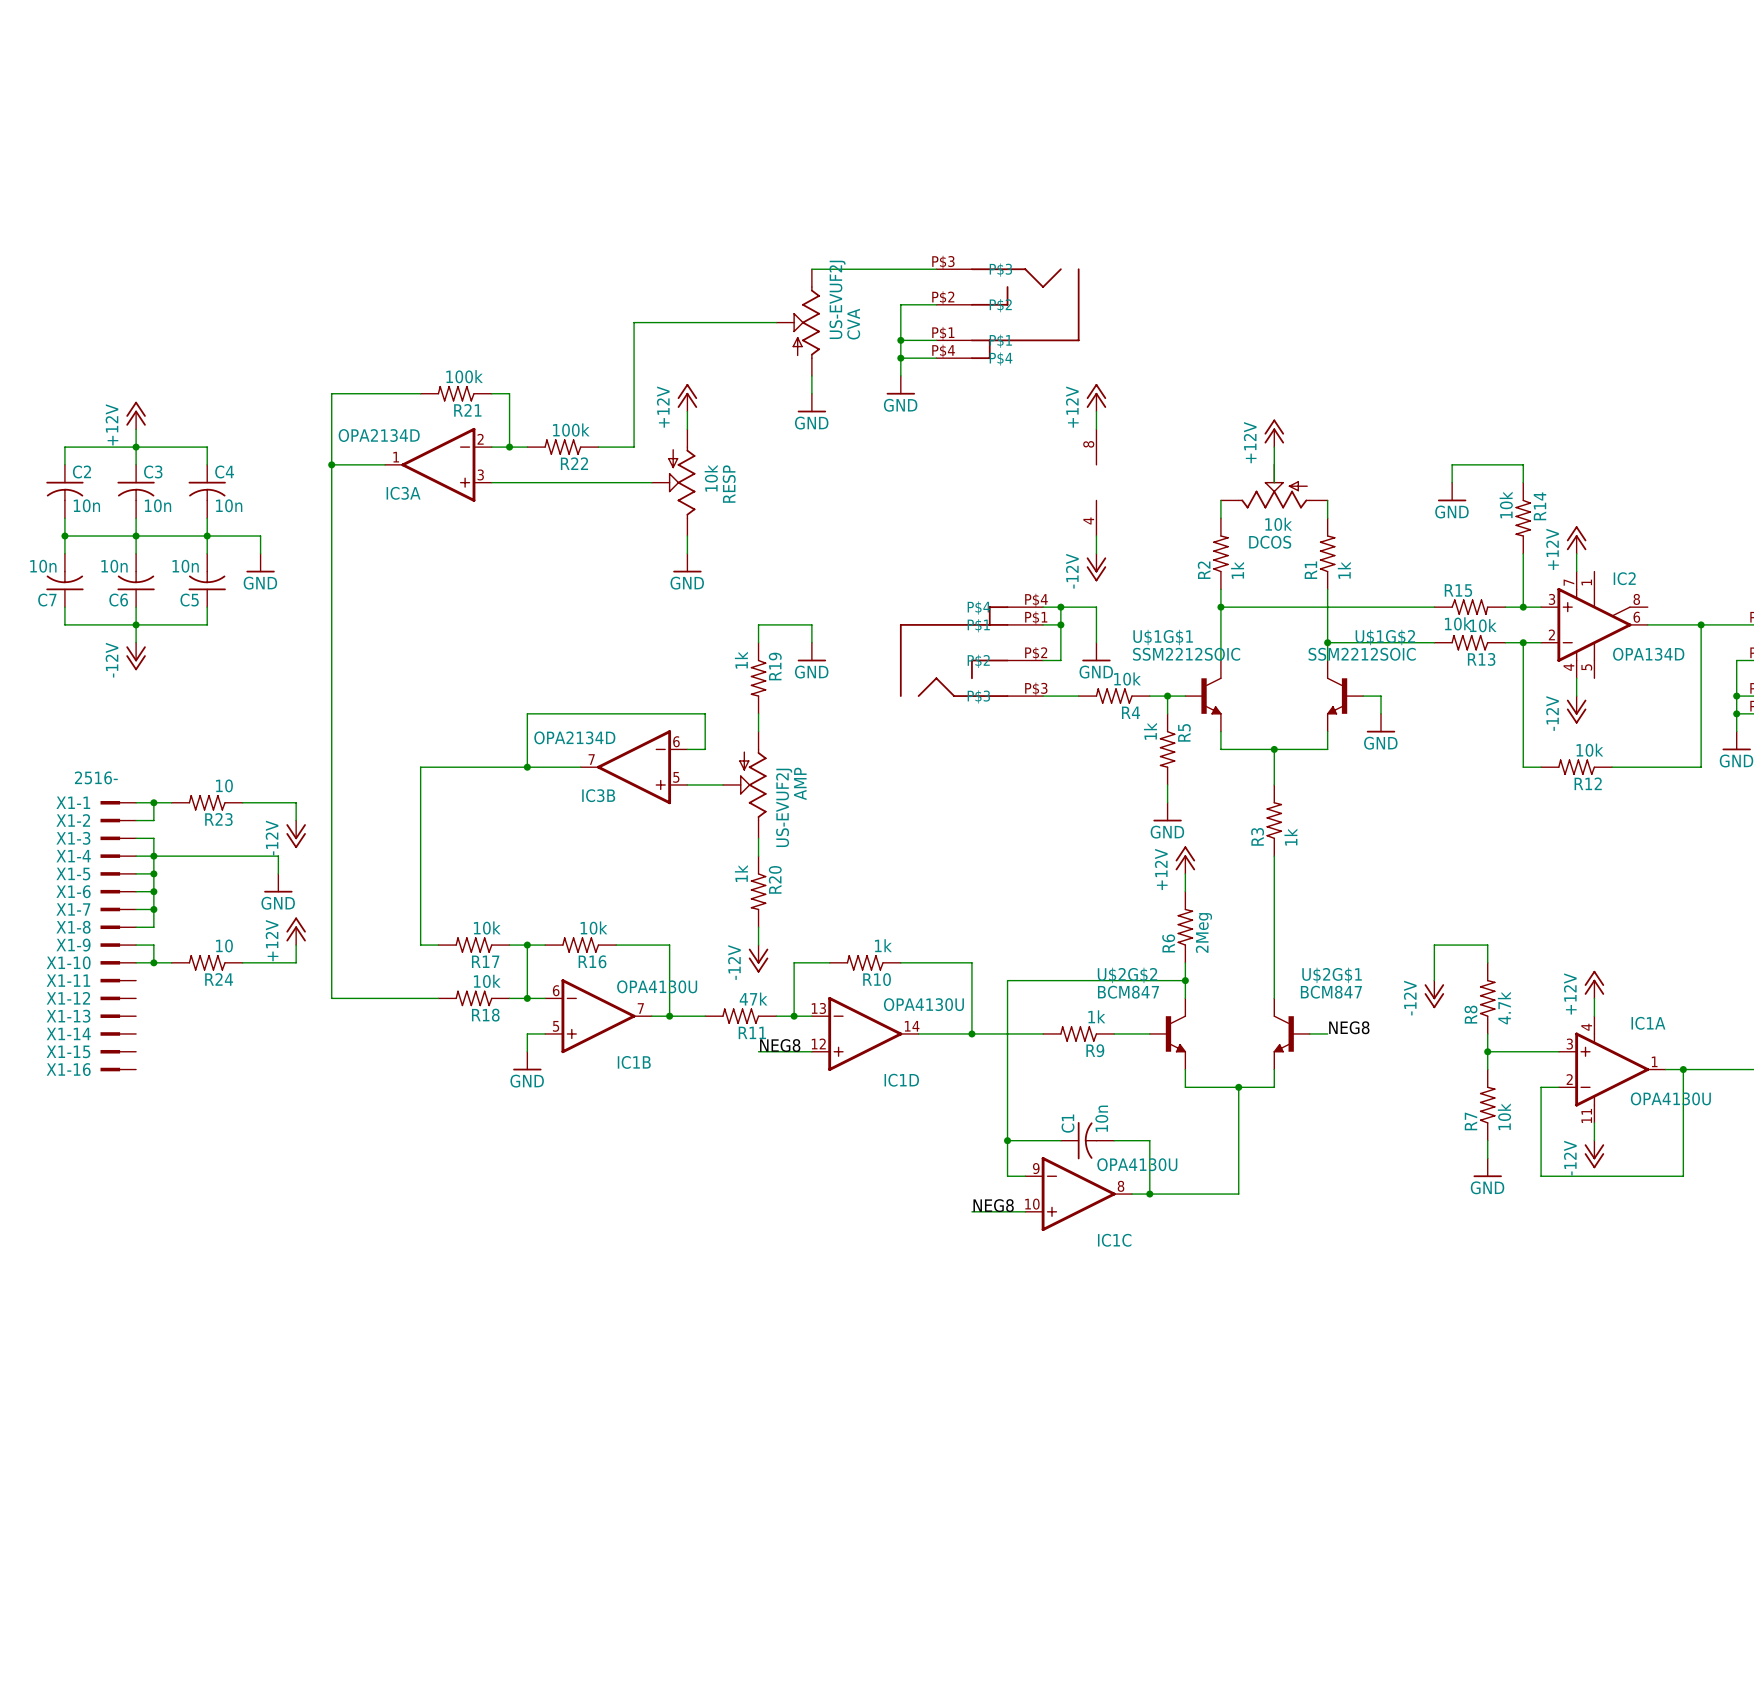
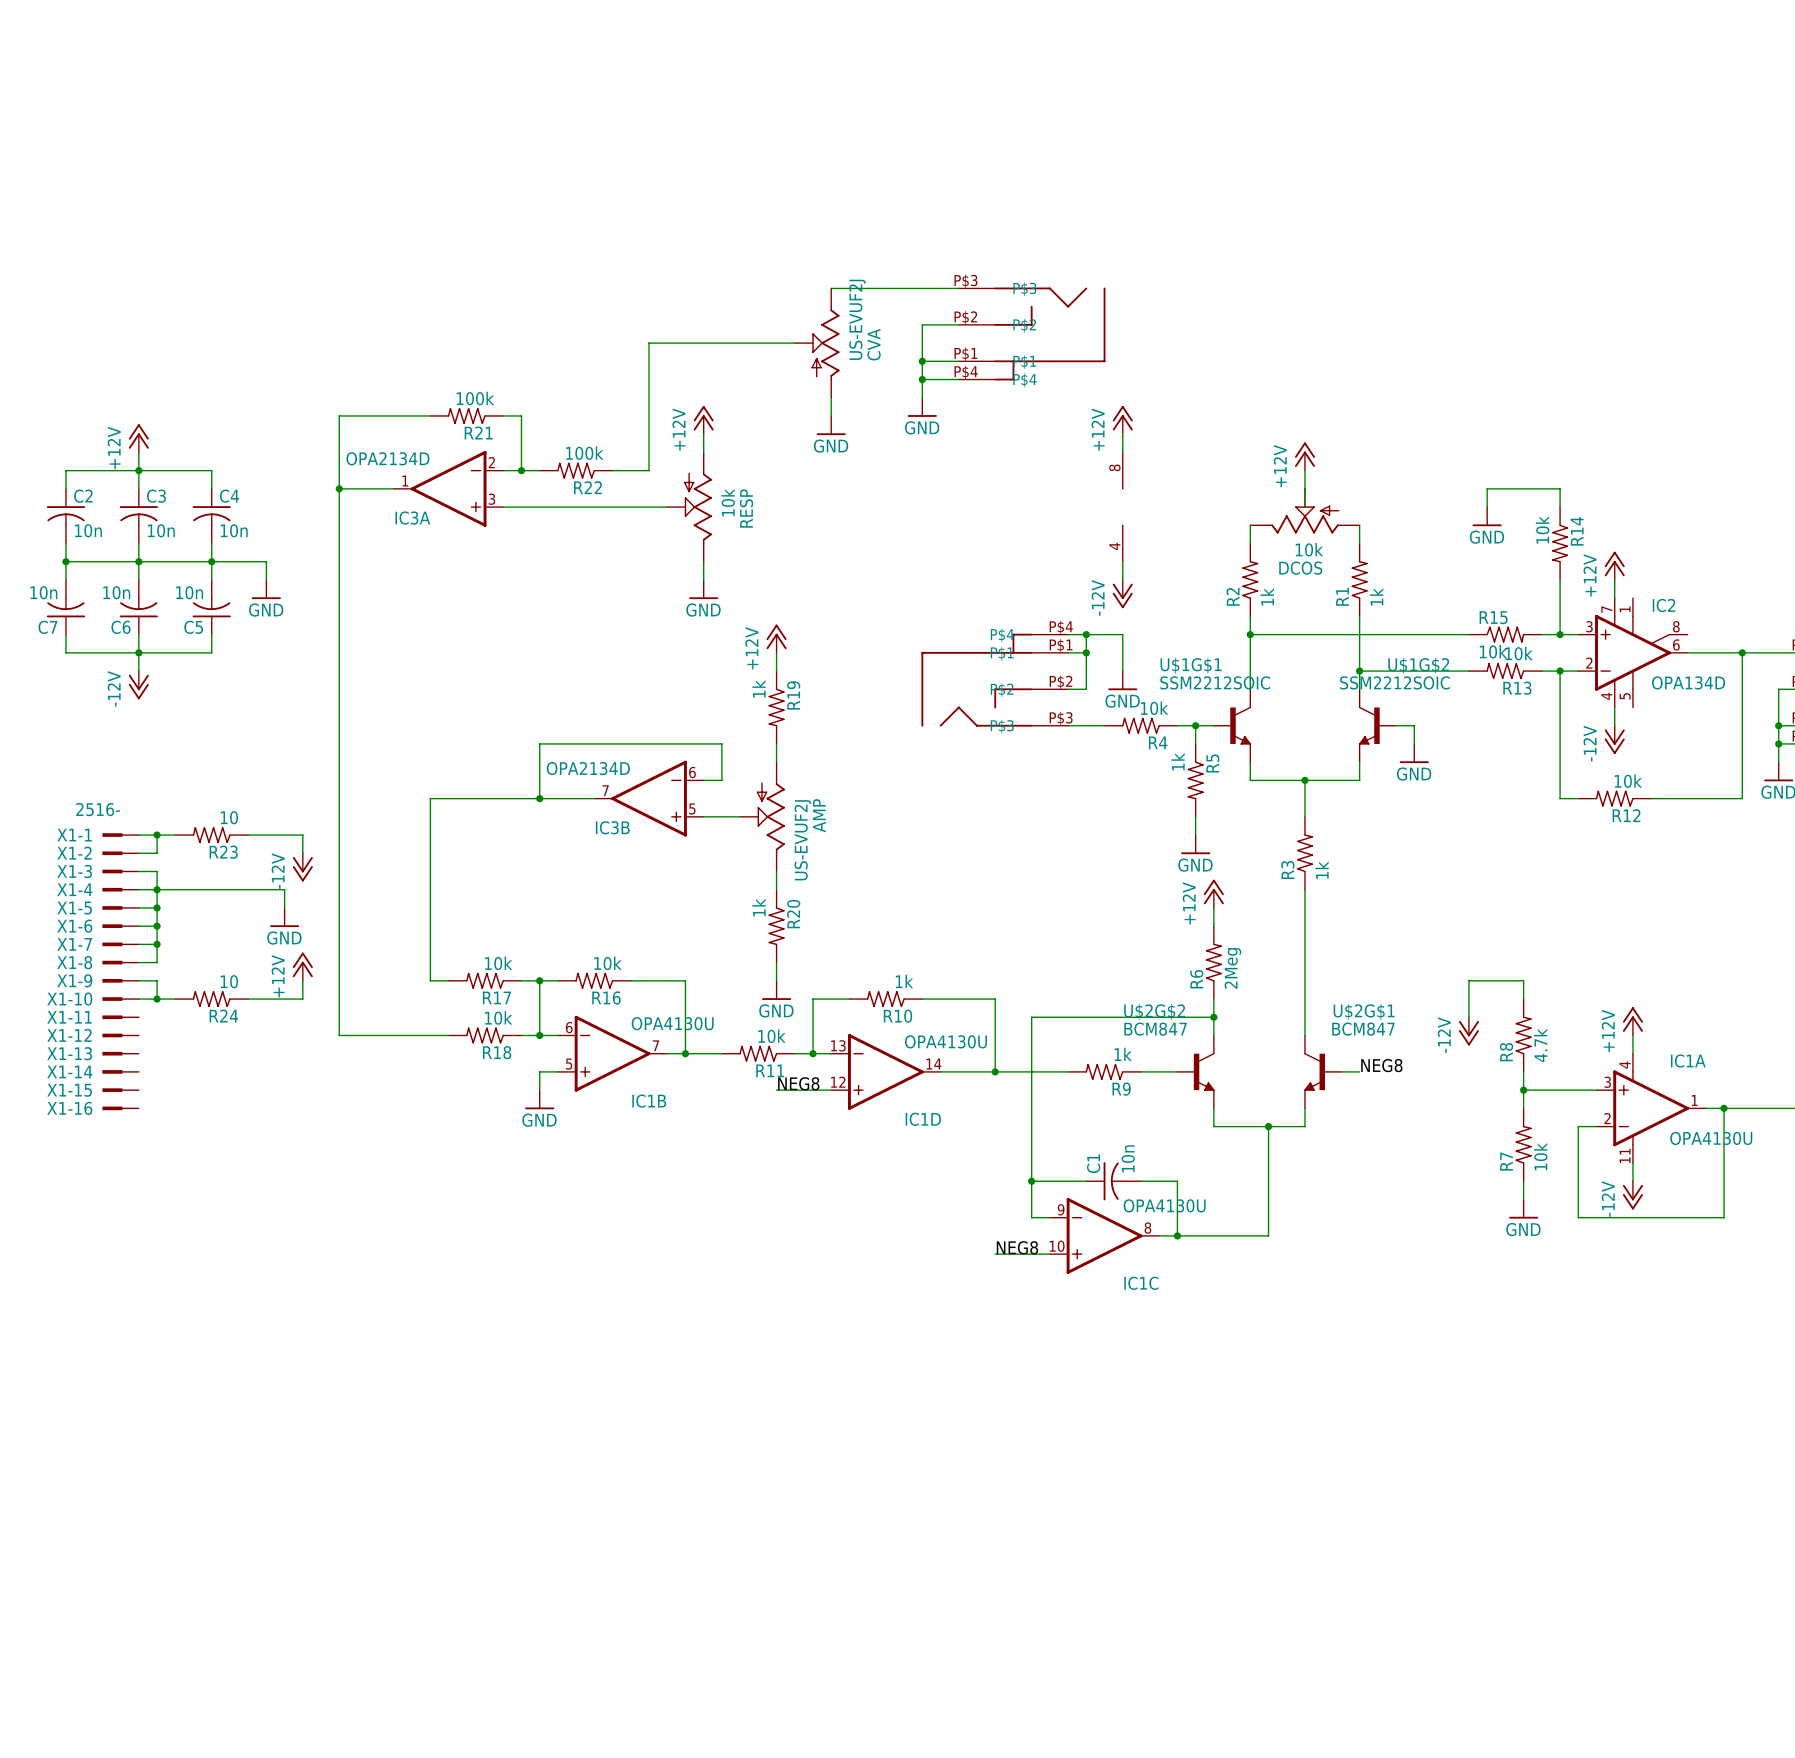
power symbol: none -> +12V (776, 638)
wire: (758, 624) (811, 624) (811, 642) -> none
power symbol: GND (811, 652) -> none
power symbol: -12V (758, 958) -> GND (776, 990)
R11 value: 47k (753, 999) -> 10k (771, 1036)

